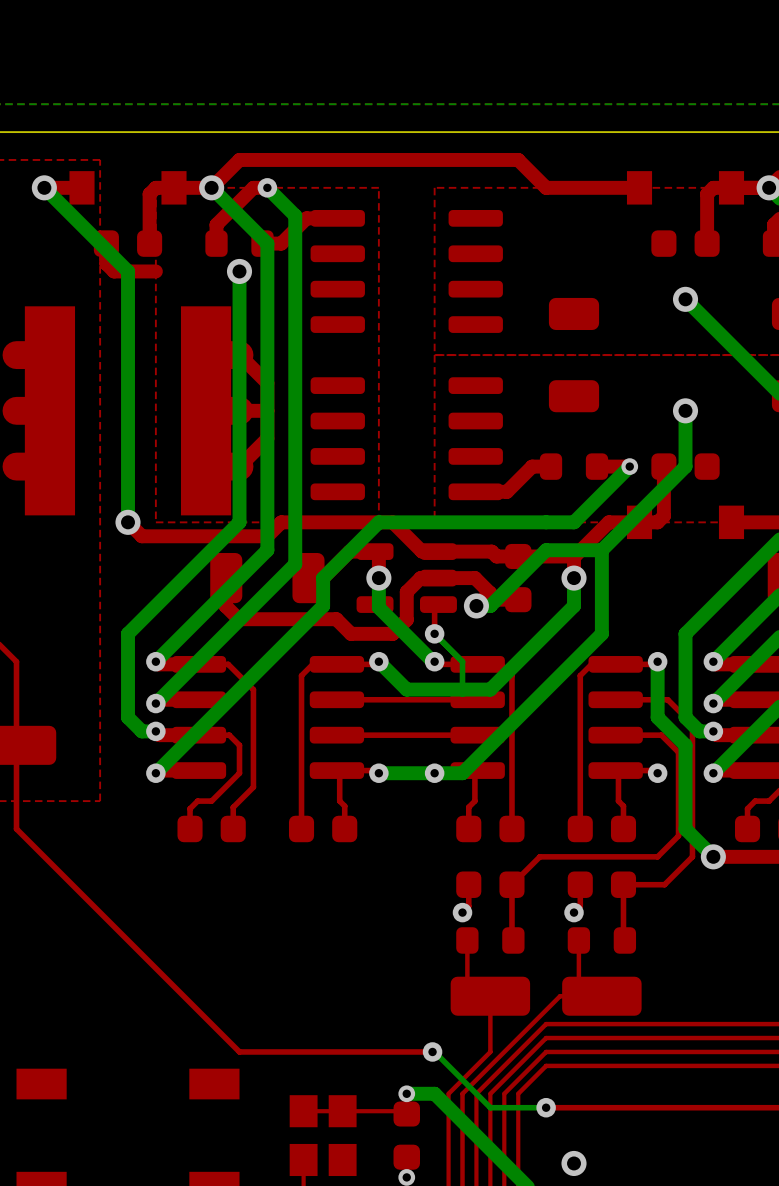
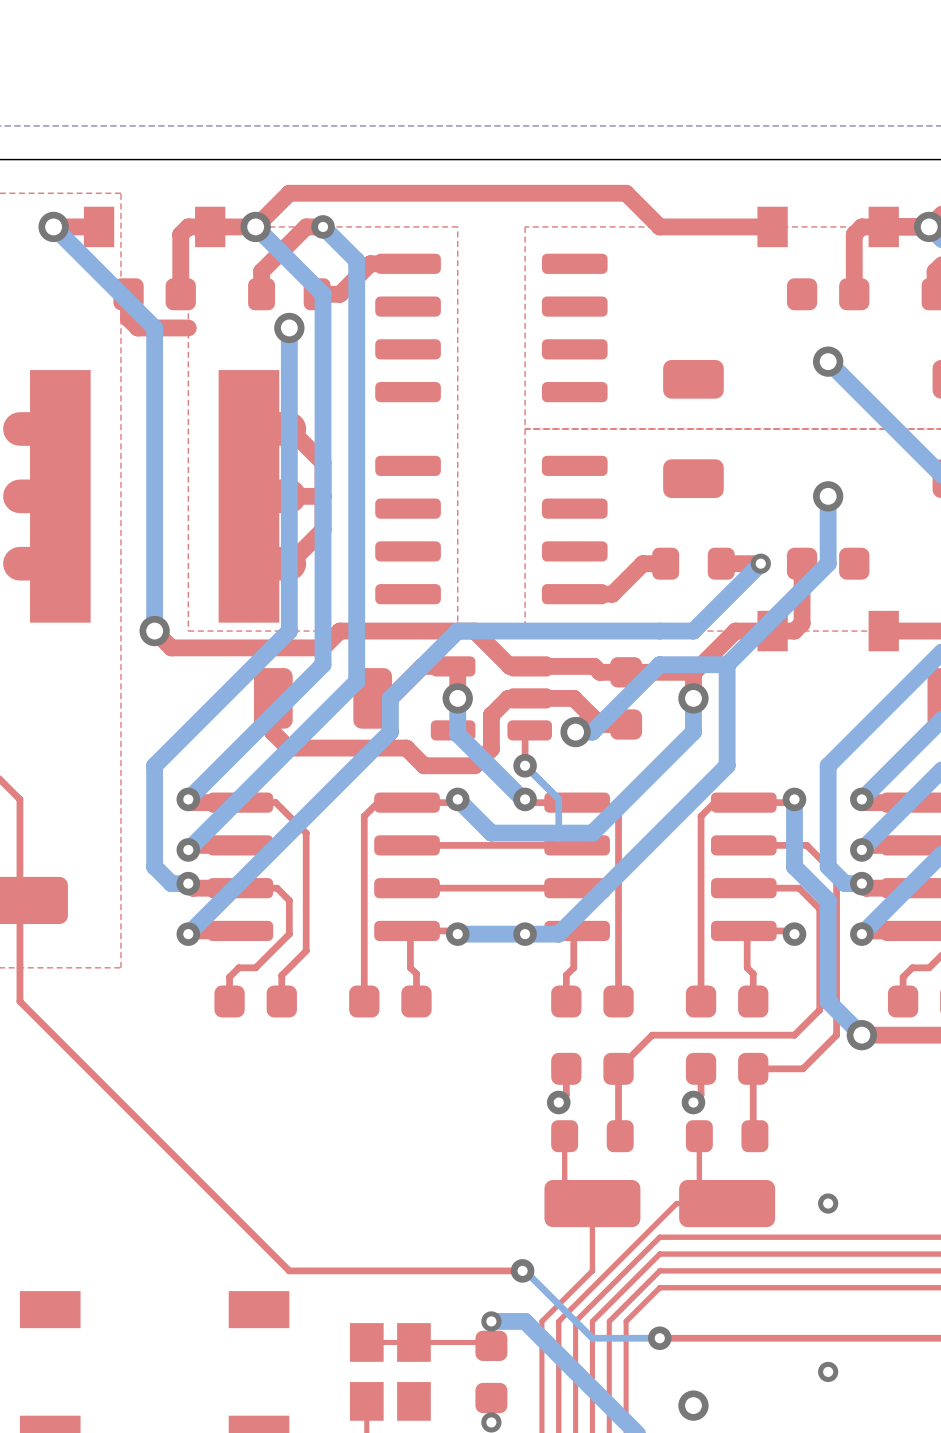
via: none -> (828, 1203)
via: none -> (828, 1371)

